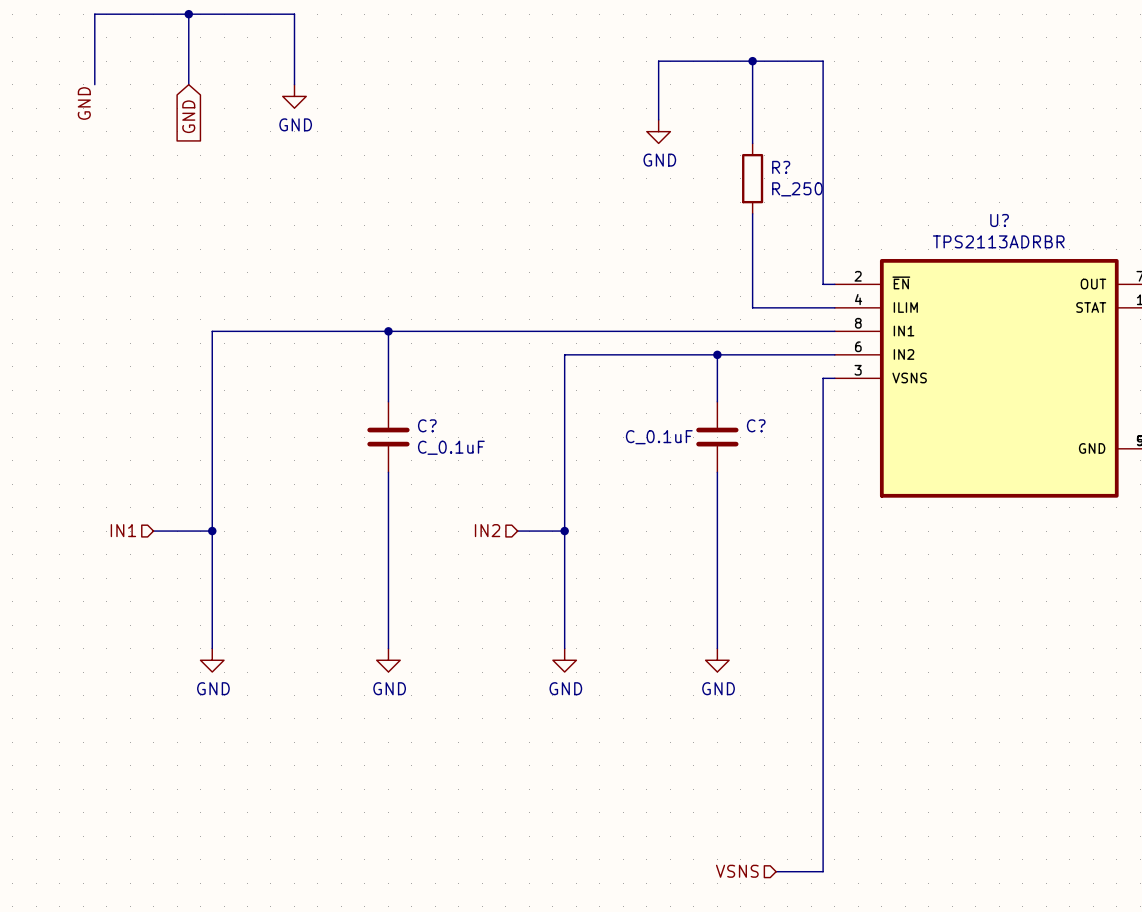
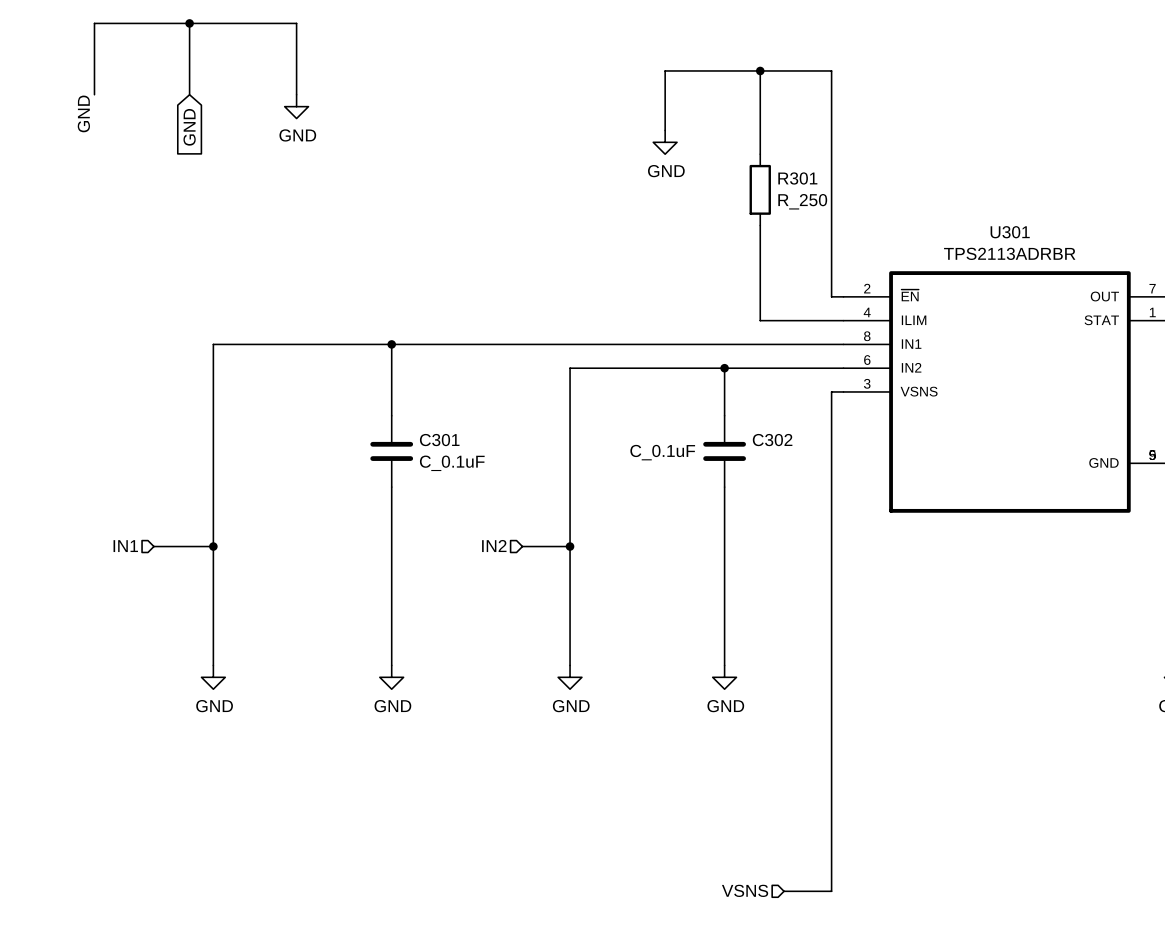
R? name: R? (781, 167) -> R301 (797, 178)
U? name: U? (999, 220) -> U301 (1010, 232)
C? name: C? (427, 425) -> C301 (439, 440)
C? name: C? (756, 425) -> C302 (772, 440)

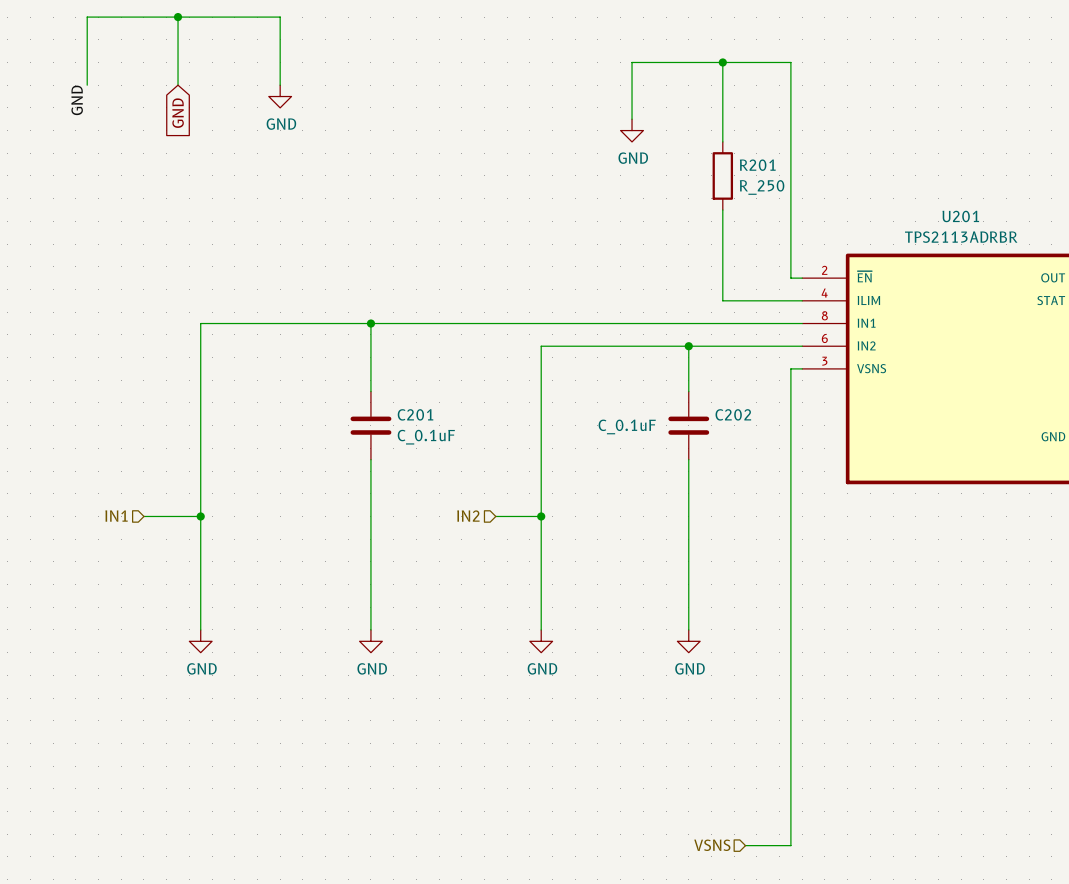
R301 name: R301 (797, 178) -> R201 (757, 165)
U301 name: U301 (1010, 232) -> U201 (960, 216)
C301 name: C301 (439, 440) -> C201 (415, 414)
C302 name: C302 (772, 440) -> C202 (733, 414)

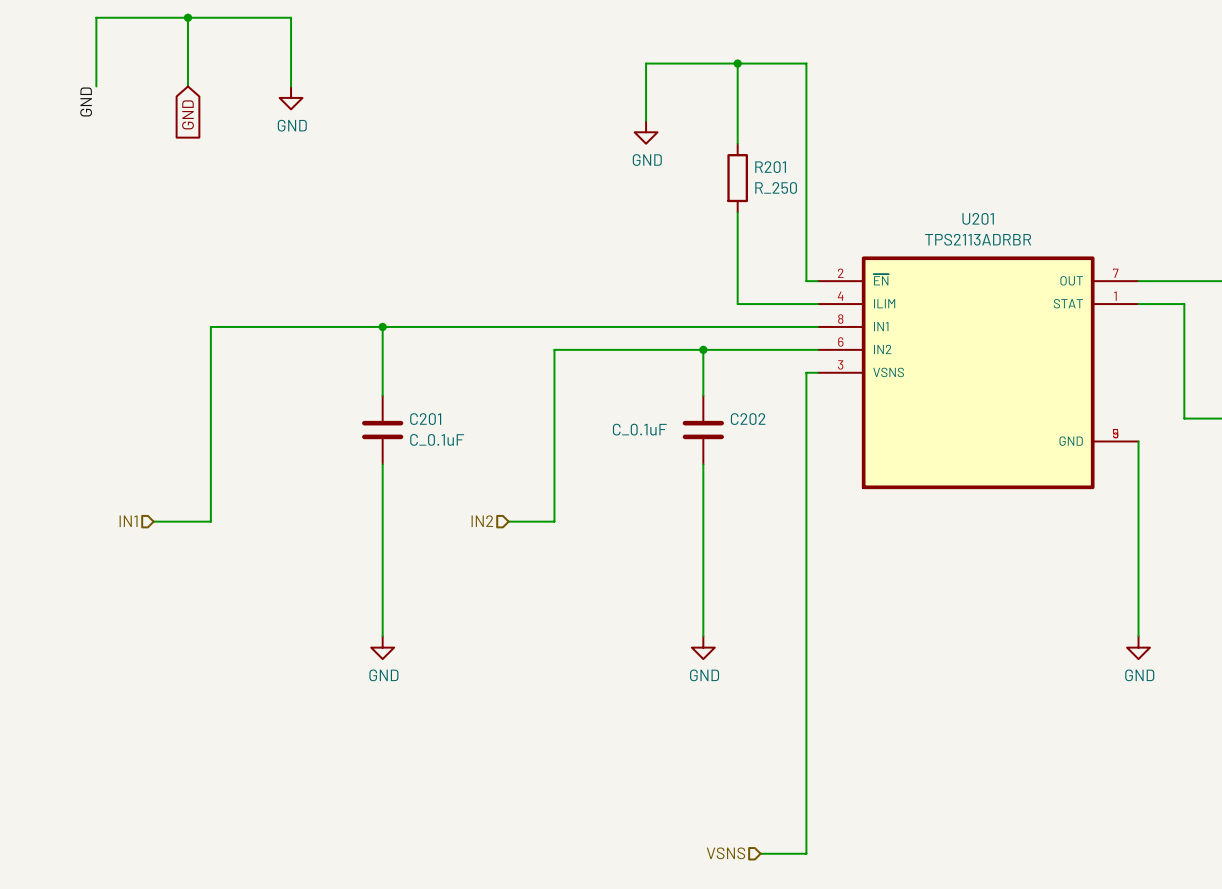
wire: (200, 516) (200, 629) -> none
junction: (200, 516) -> none
wire: (541, 516) (541, 629) -> none
junction: (541, 516) -> none
power symbol: GND (200, 641) -> none
power symbol: GND (541, 641) -> none

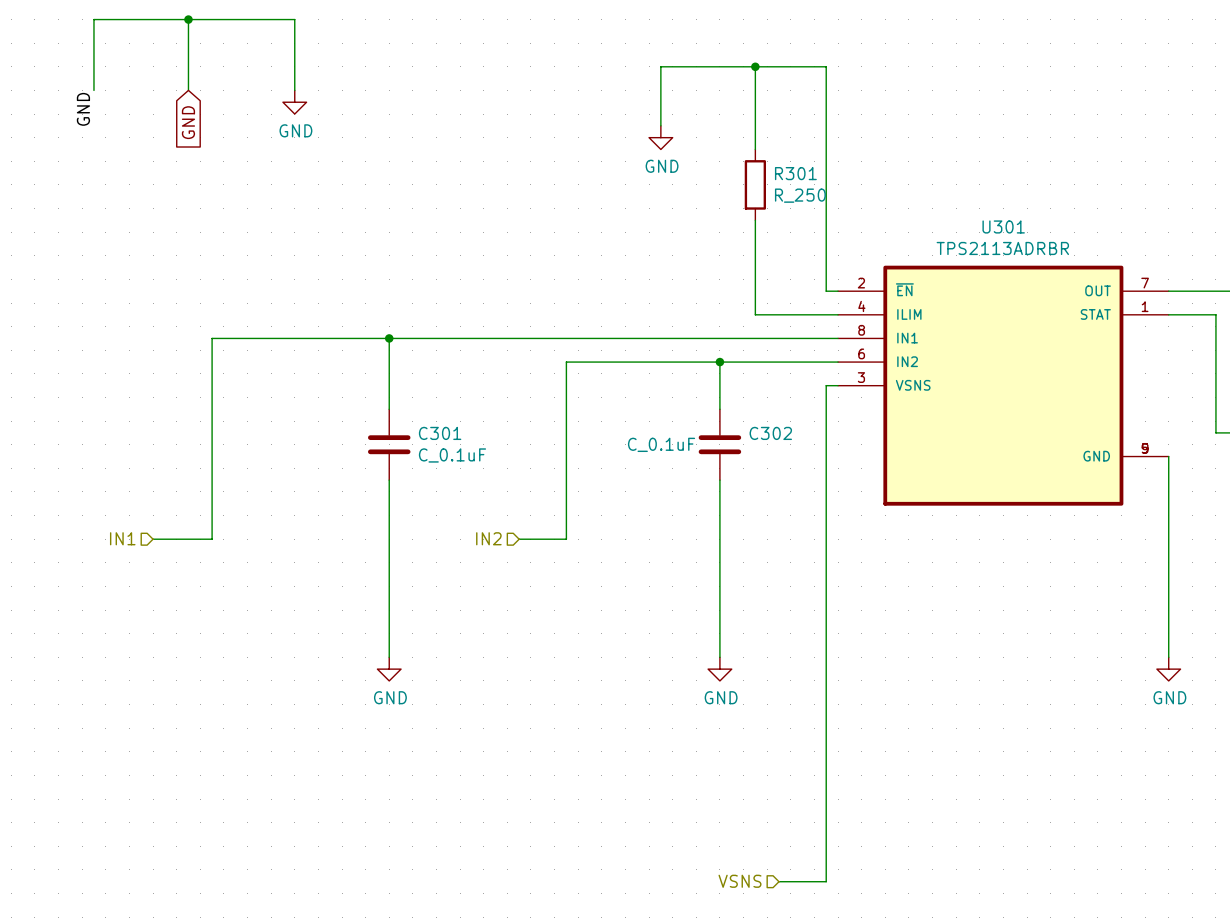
R201 name: R201 (770, 167) -> R301 (795, 173)
U201 name: U201 (978, 218) -> U301 (1003, 226)
C201 name: C201 (425, 419) -> C301 (440, 433)
C202 name: C202 (748, 419) -> C302 (770, 433)

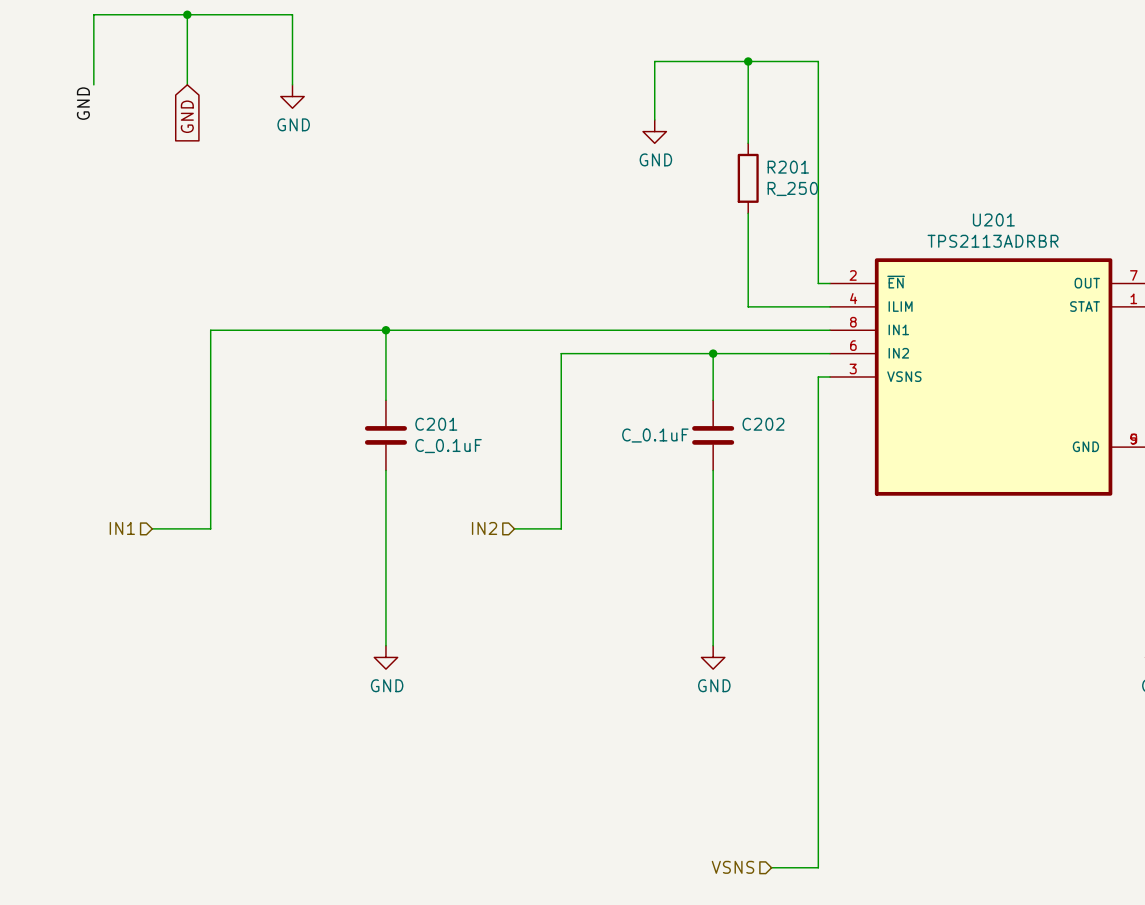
R301 name: R301 (795, 173) -> R201 (788, 167)
U301 name: U301 (1003, 226) -> U201 (993, 219)
C301 name: C301 (440, 433) -> C201 (436, 424)
C302 name: C302 (770, 433) -> C202 (763, 424)

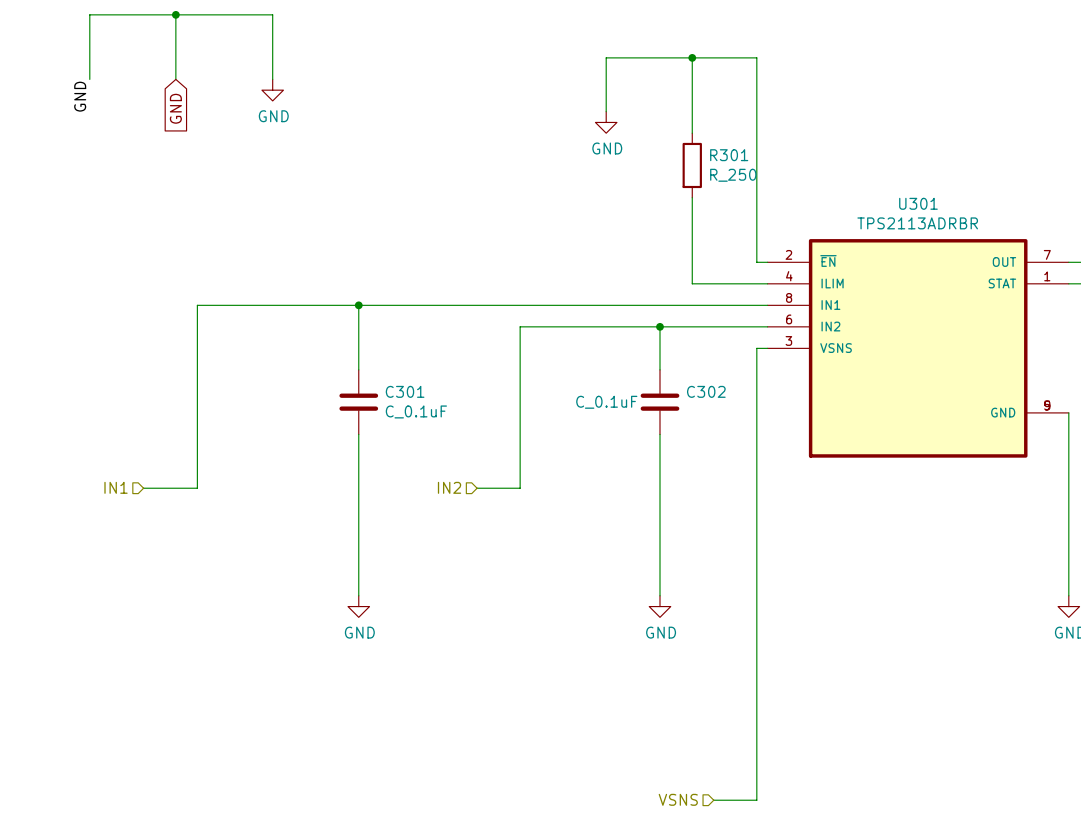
R201 name: R201 (788, 167) -> R301 (729, 155)
U201 name: U201 (993, 219) -> U301 (918, 203)
C201 name: C201 (436, 424) -> C301 (405, 391)
C202 name: C202 (763, 424) -> C302 (706, 391)

